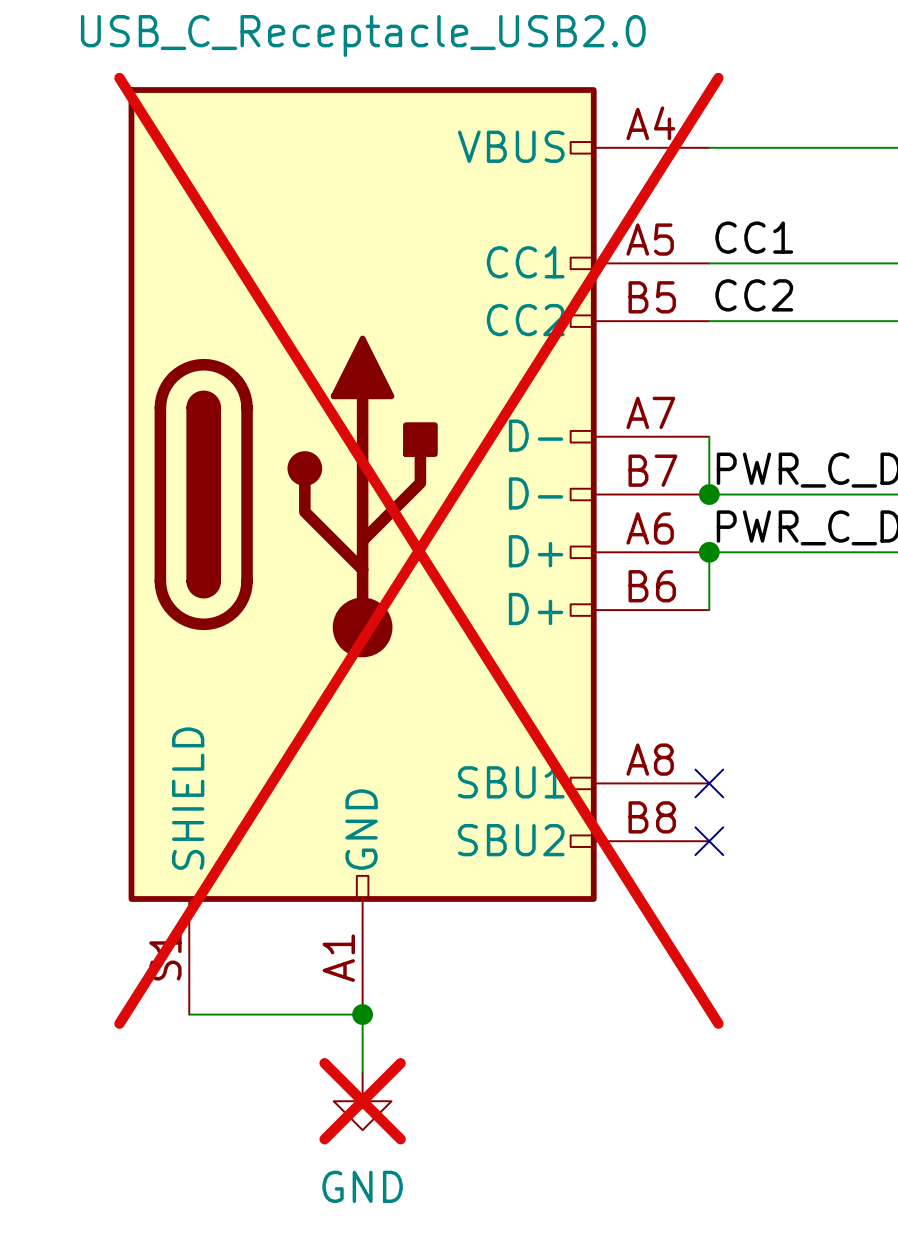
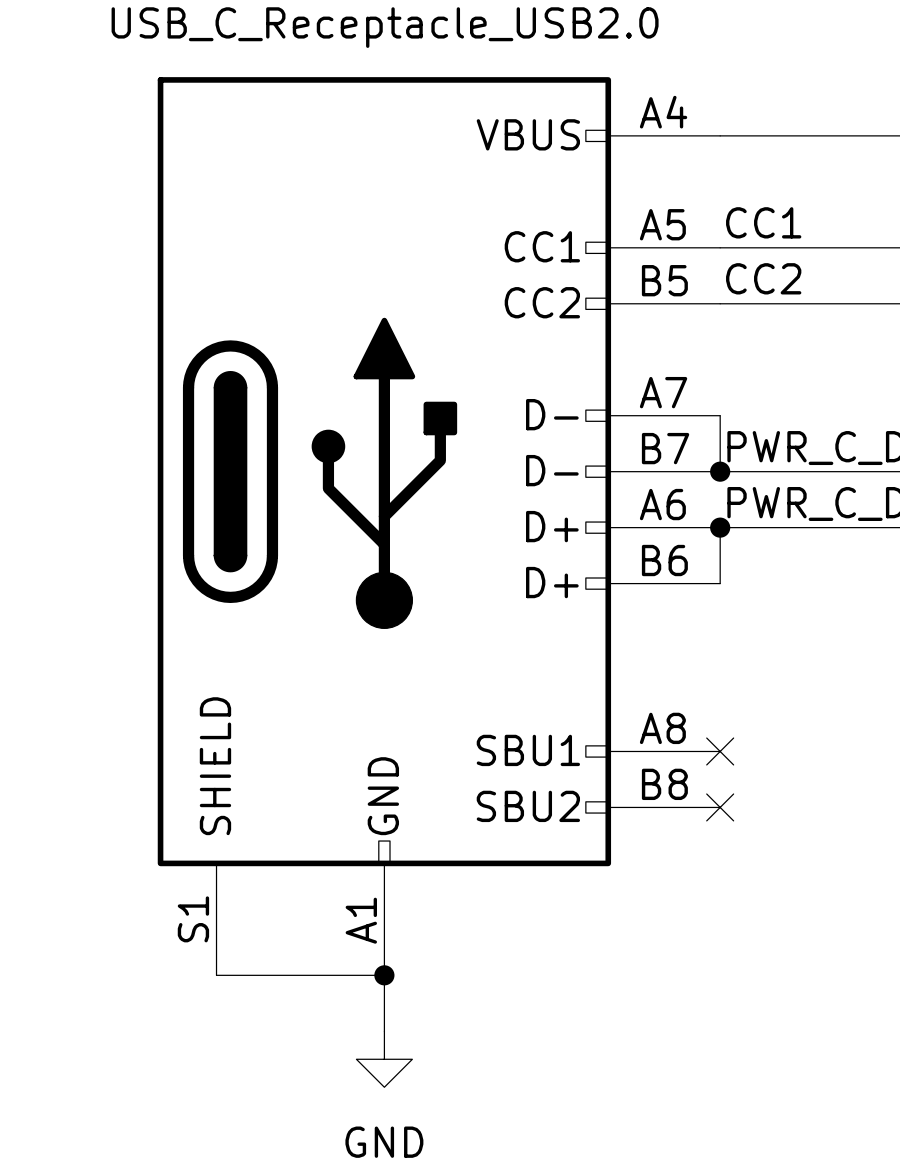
part do-not-place cross: (418, 550) -> none
power symbol do-not-place cross: (362, 1101) -> none

